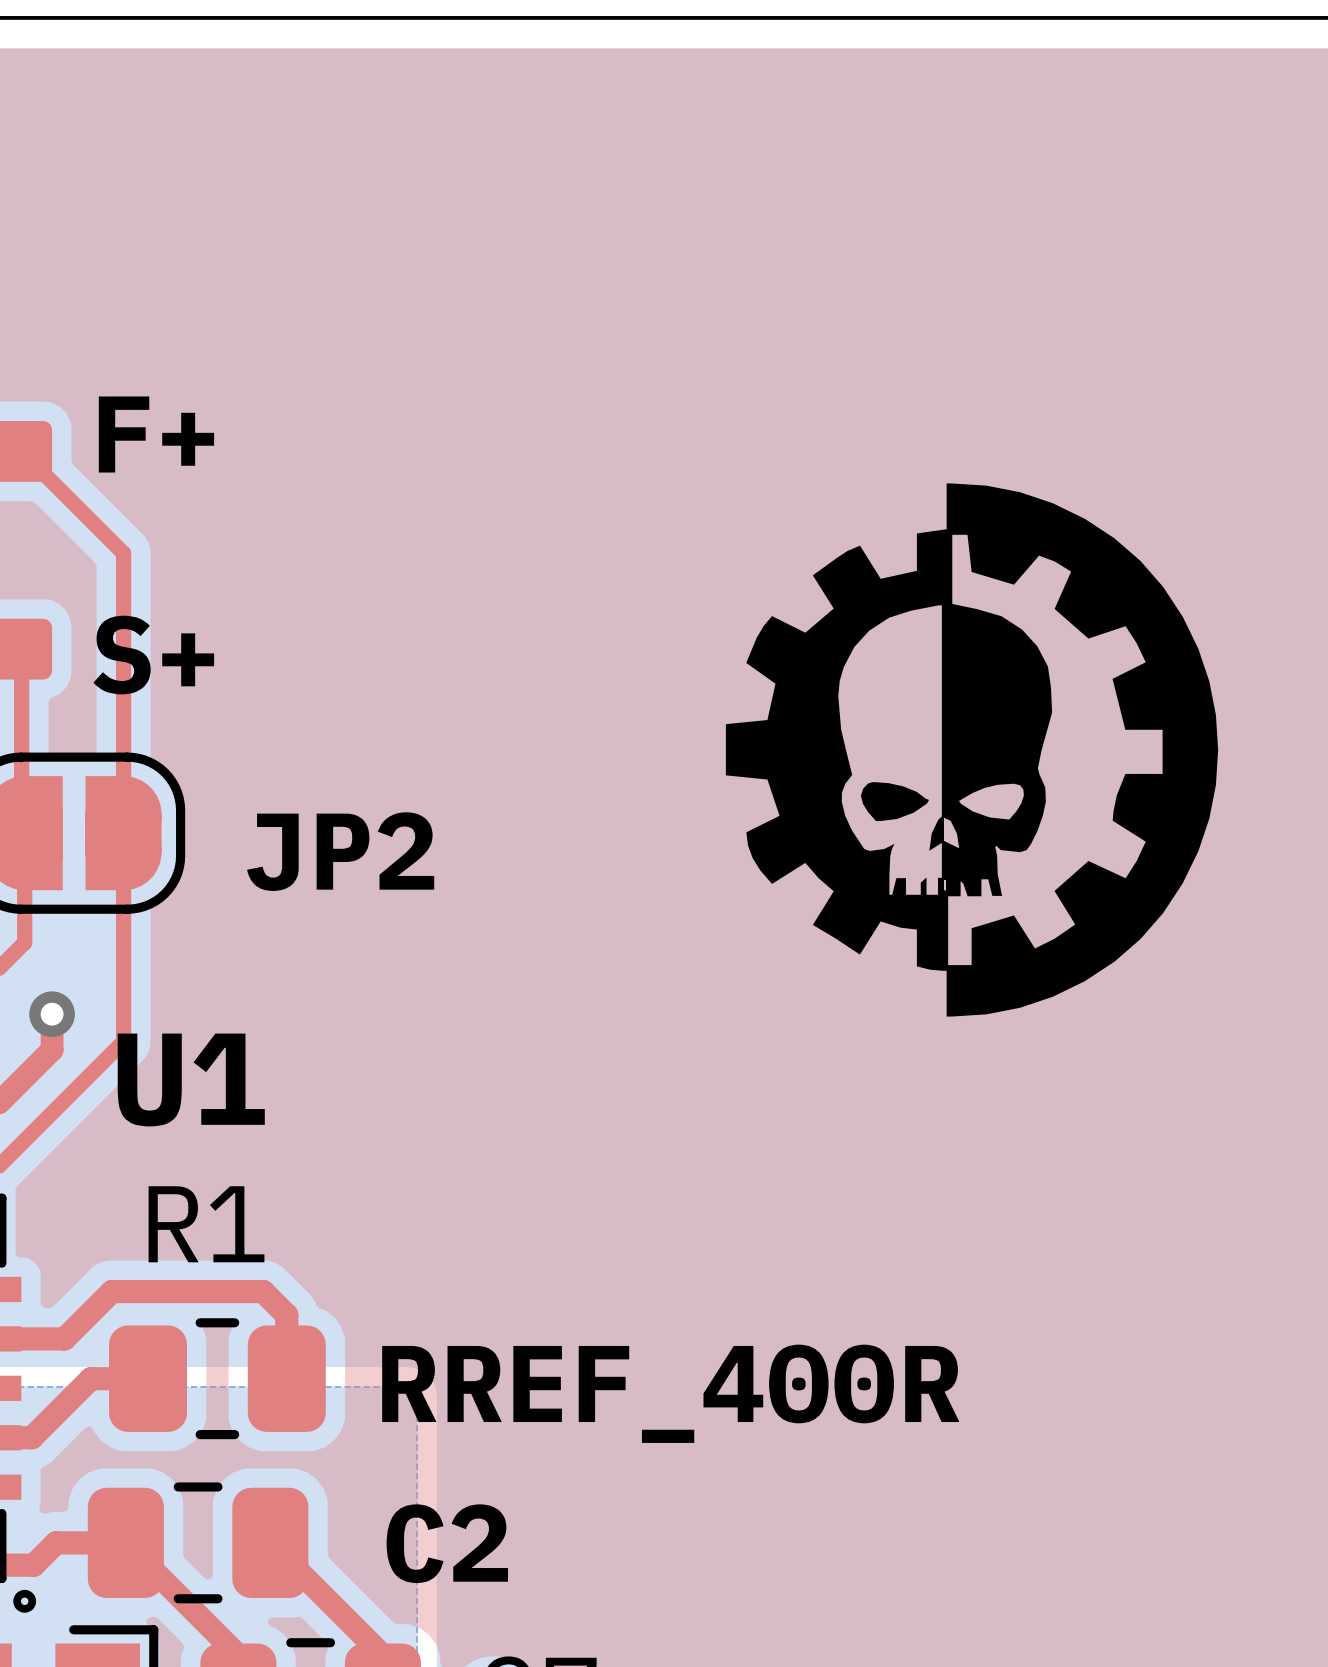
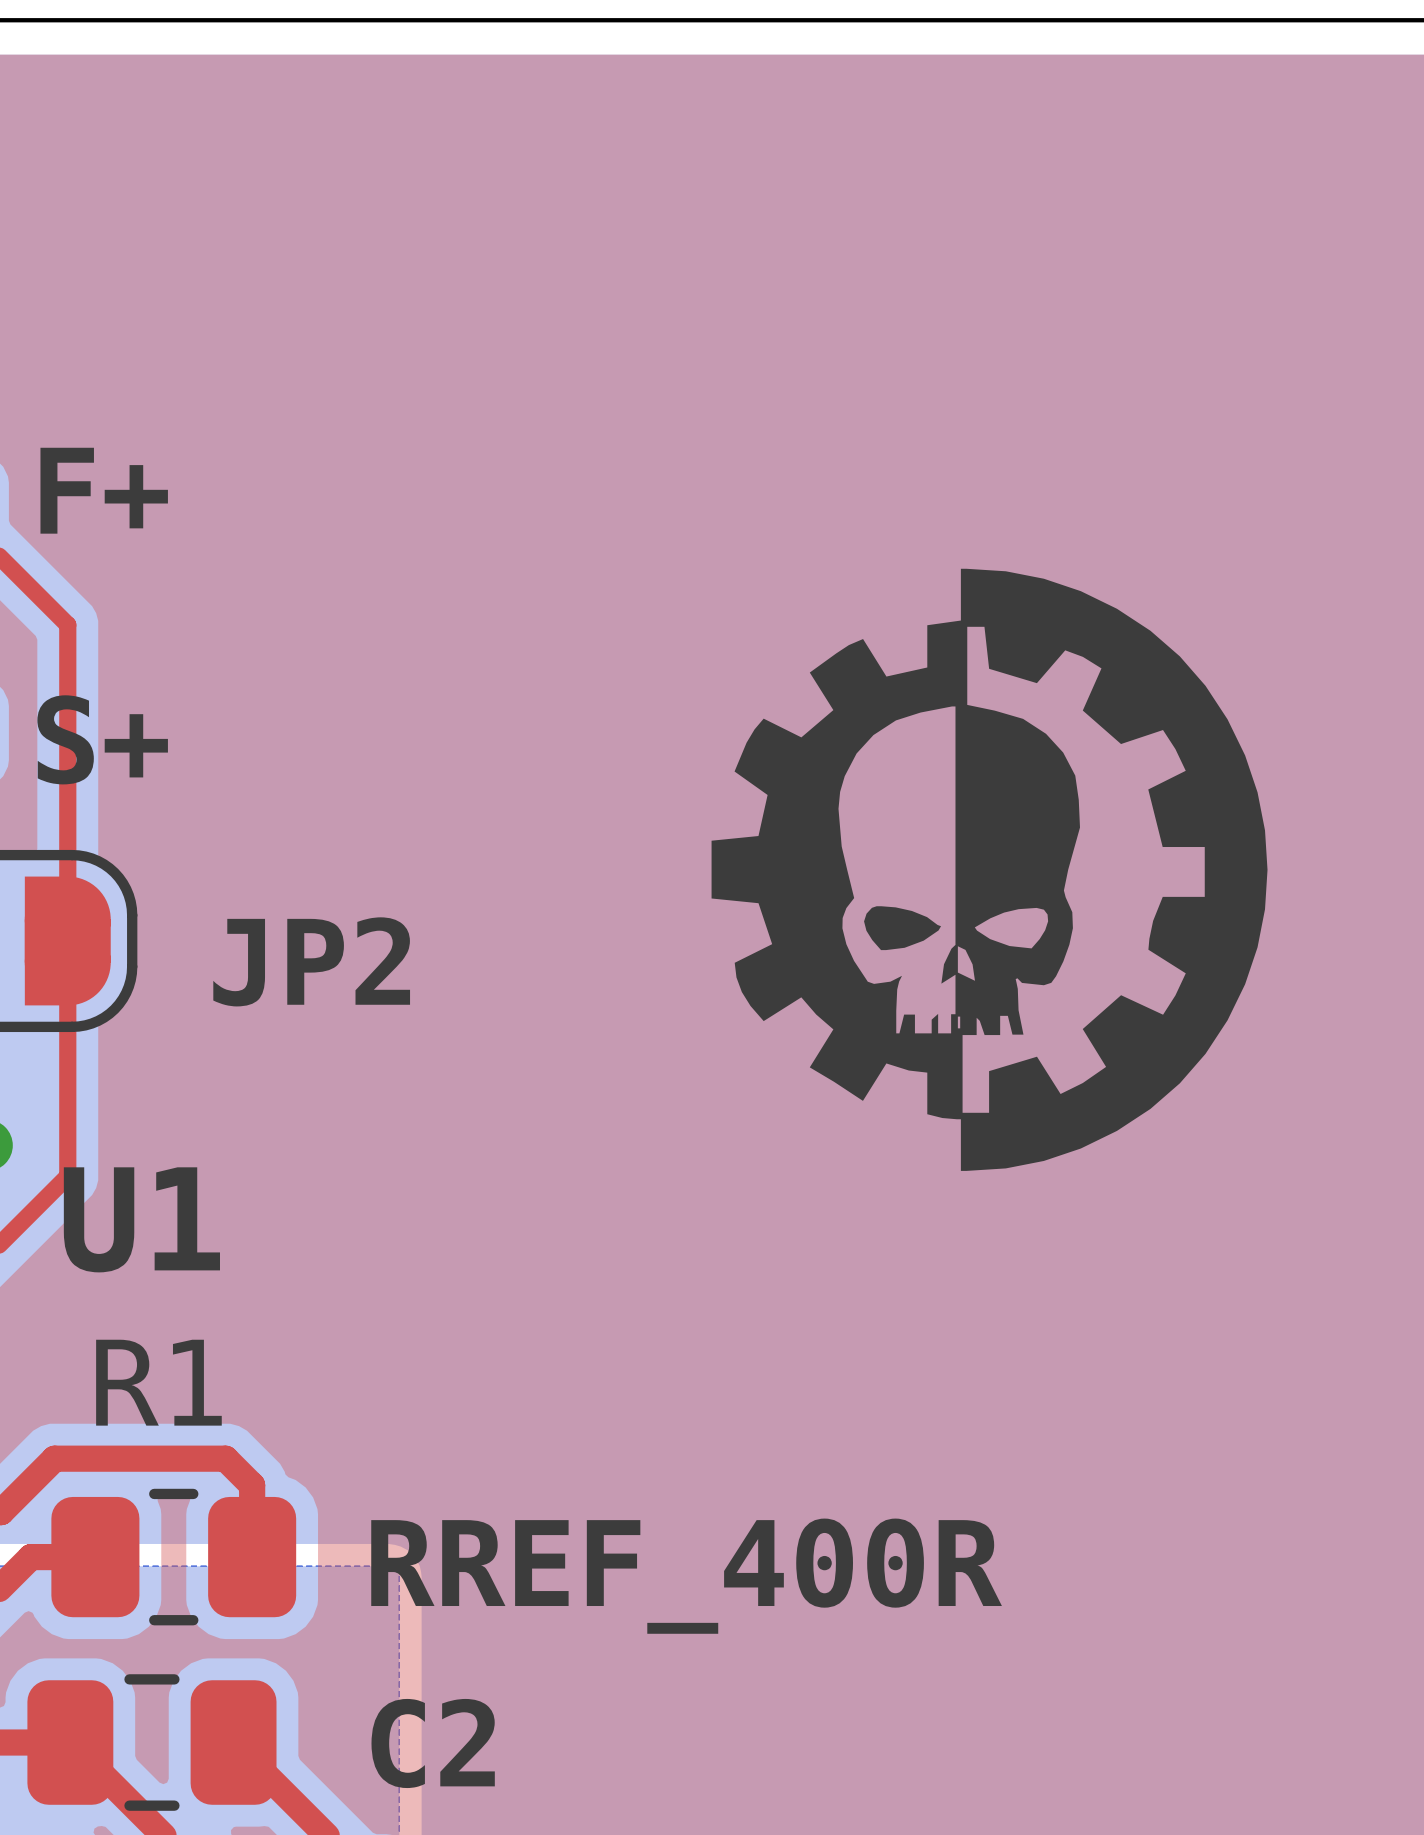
drawing position: (972, 749) -> (989, 869)
drawing position: (894, 801) -> (902, 928)

